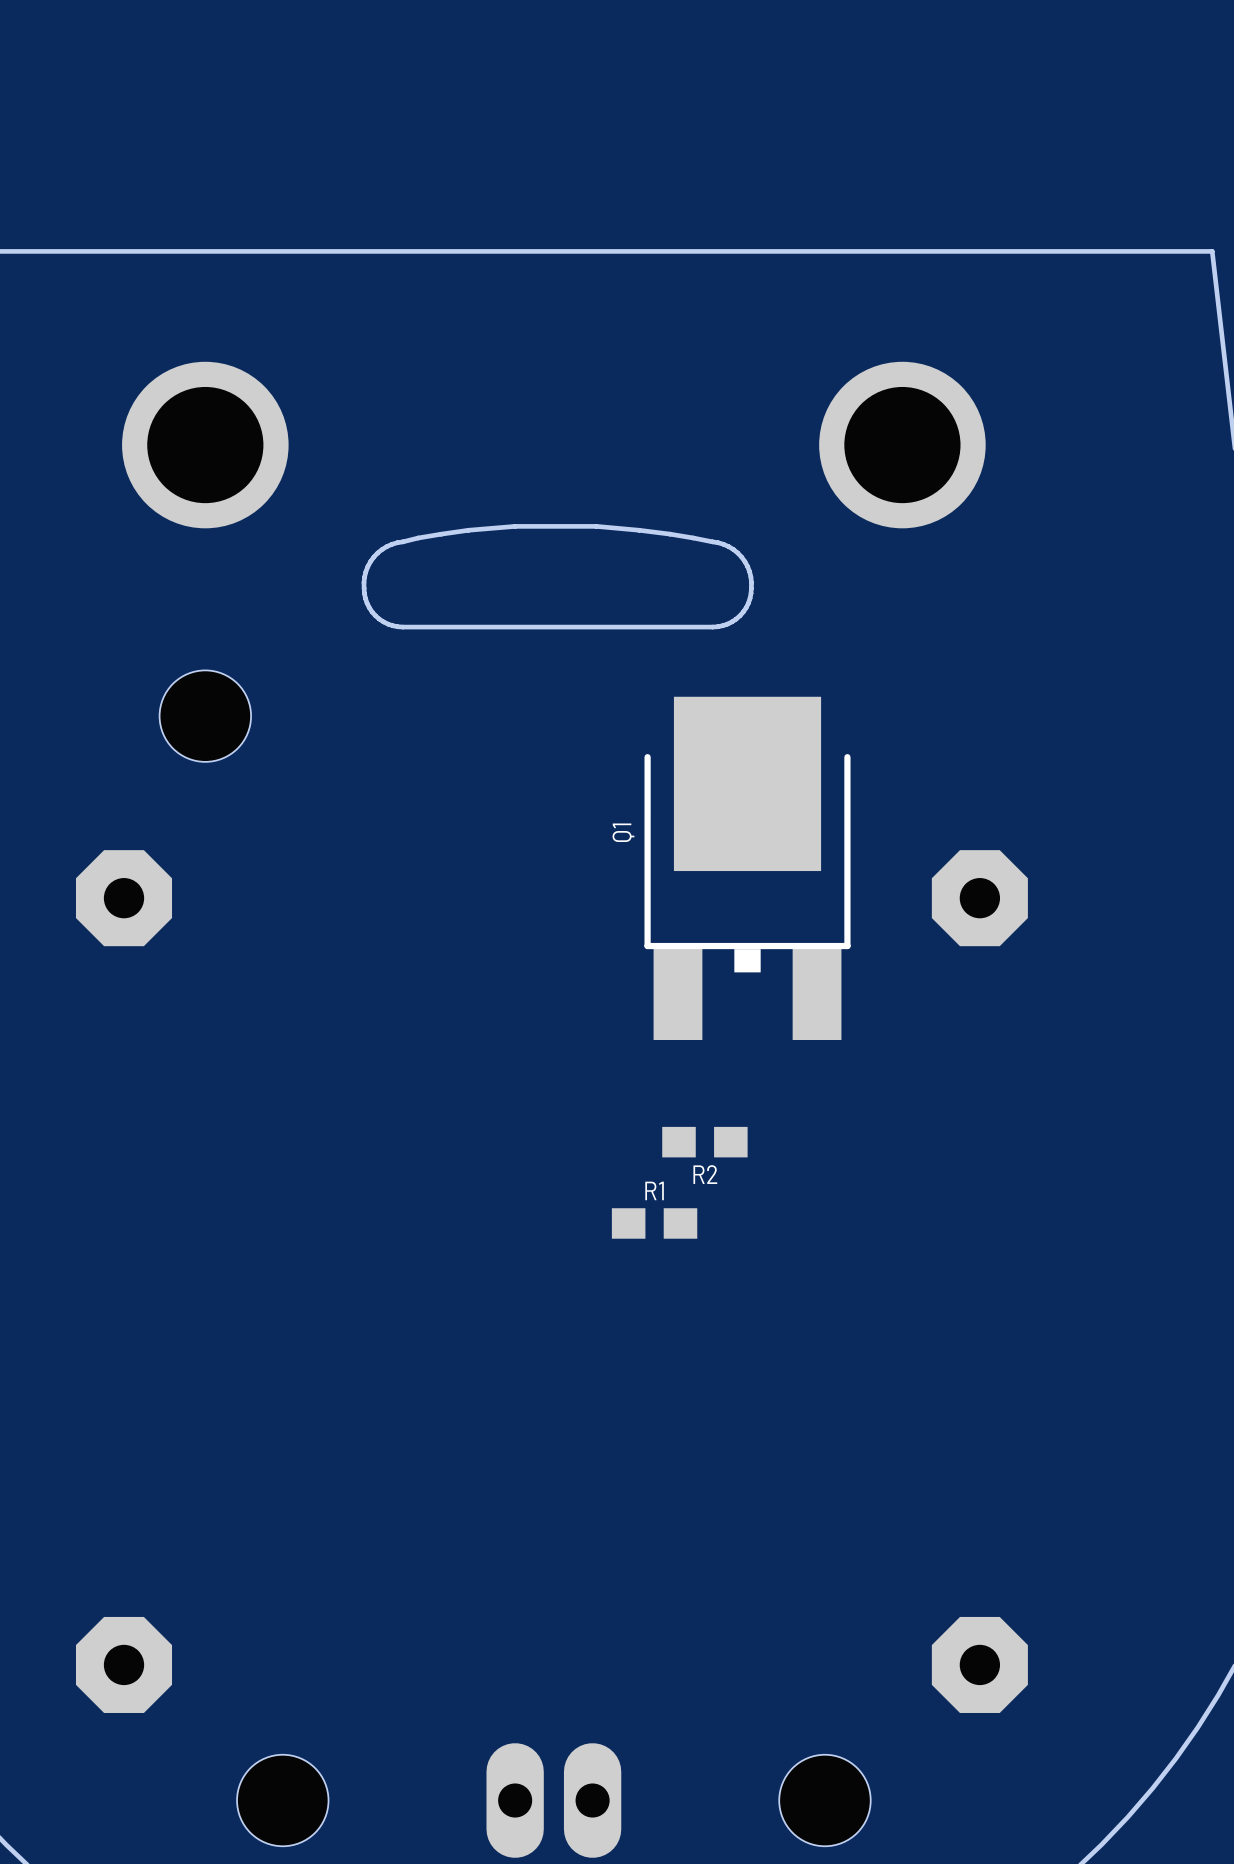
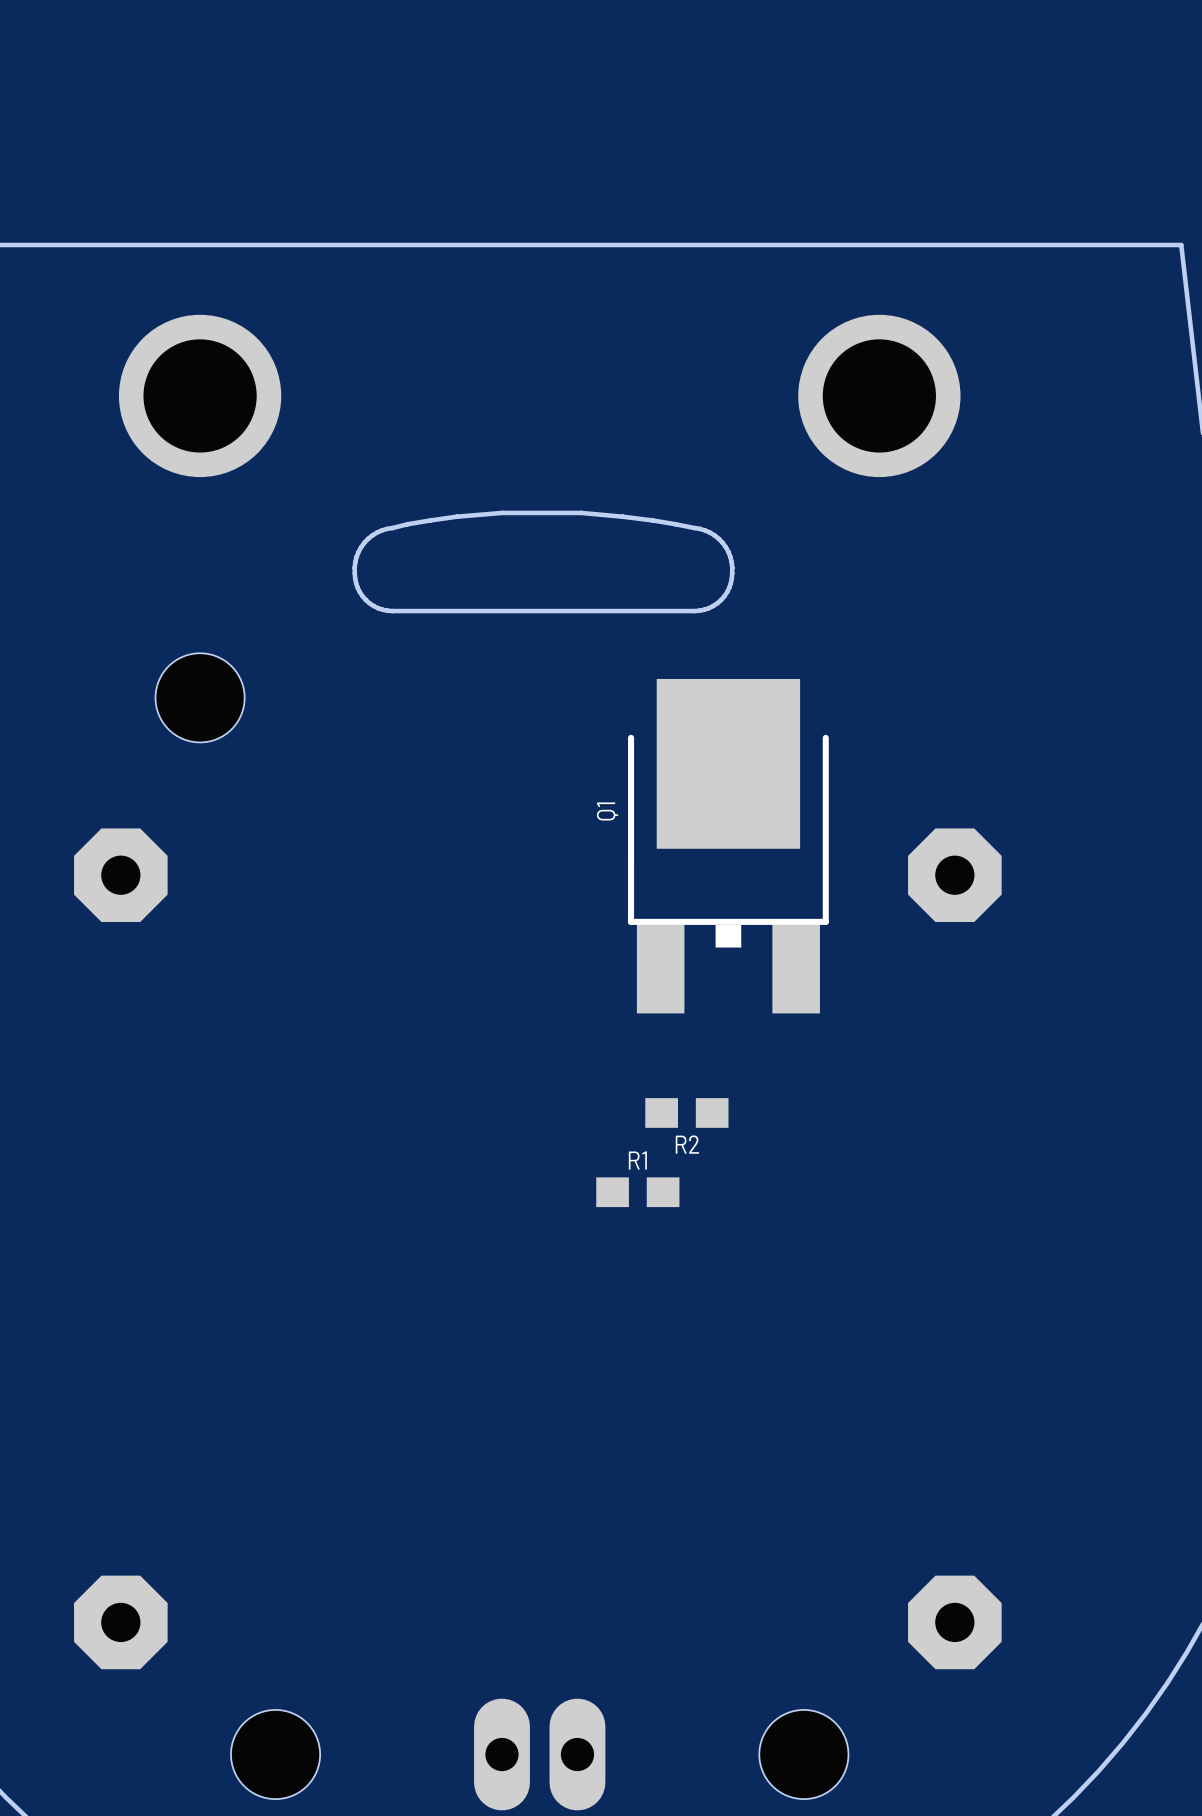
part position: (205, 445) -> (200, 395)
part position: (902, 445) -> (879, 395)

